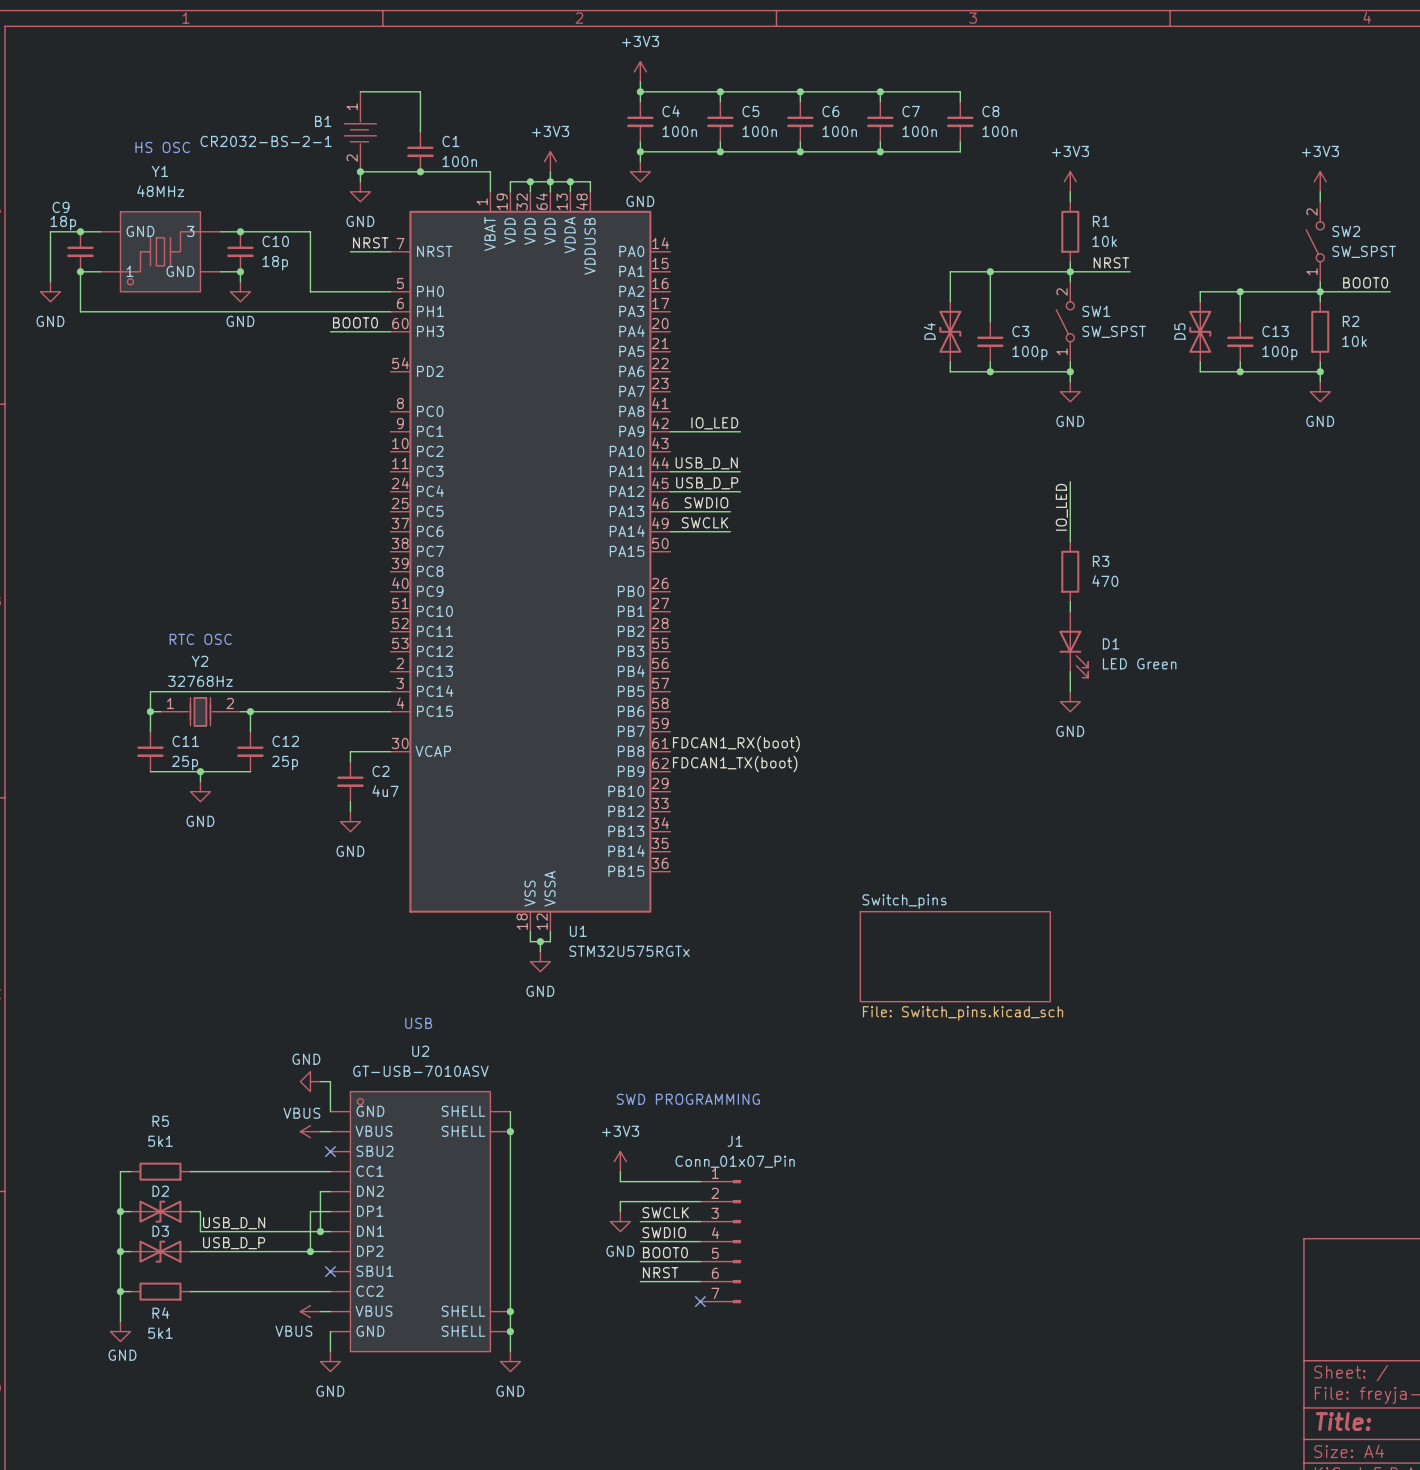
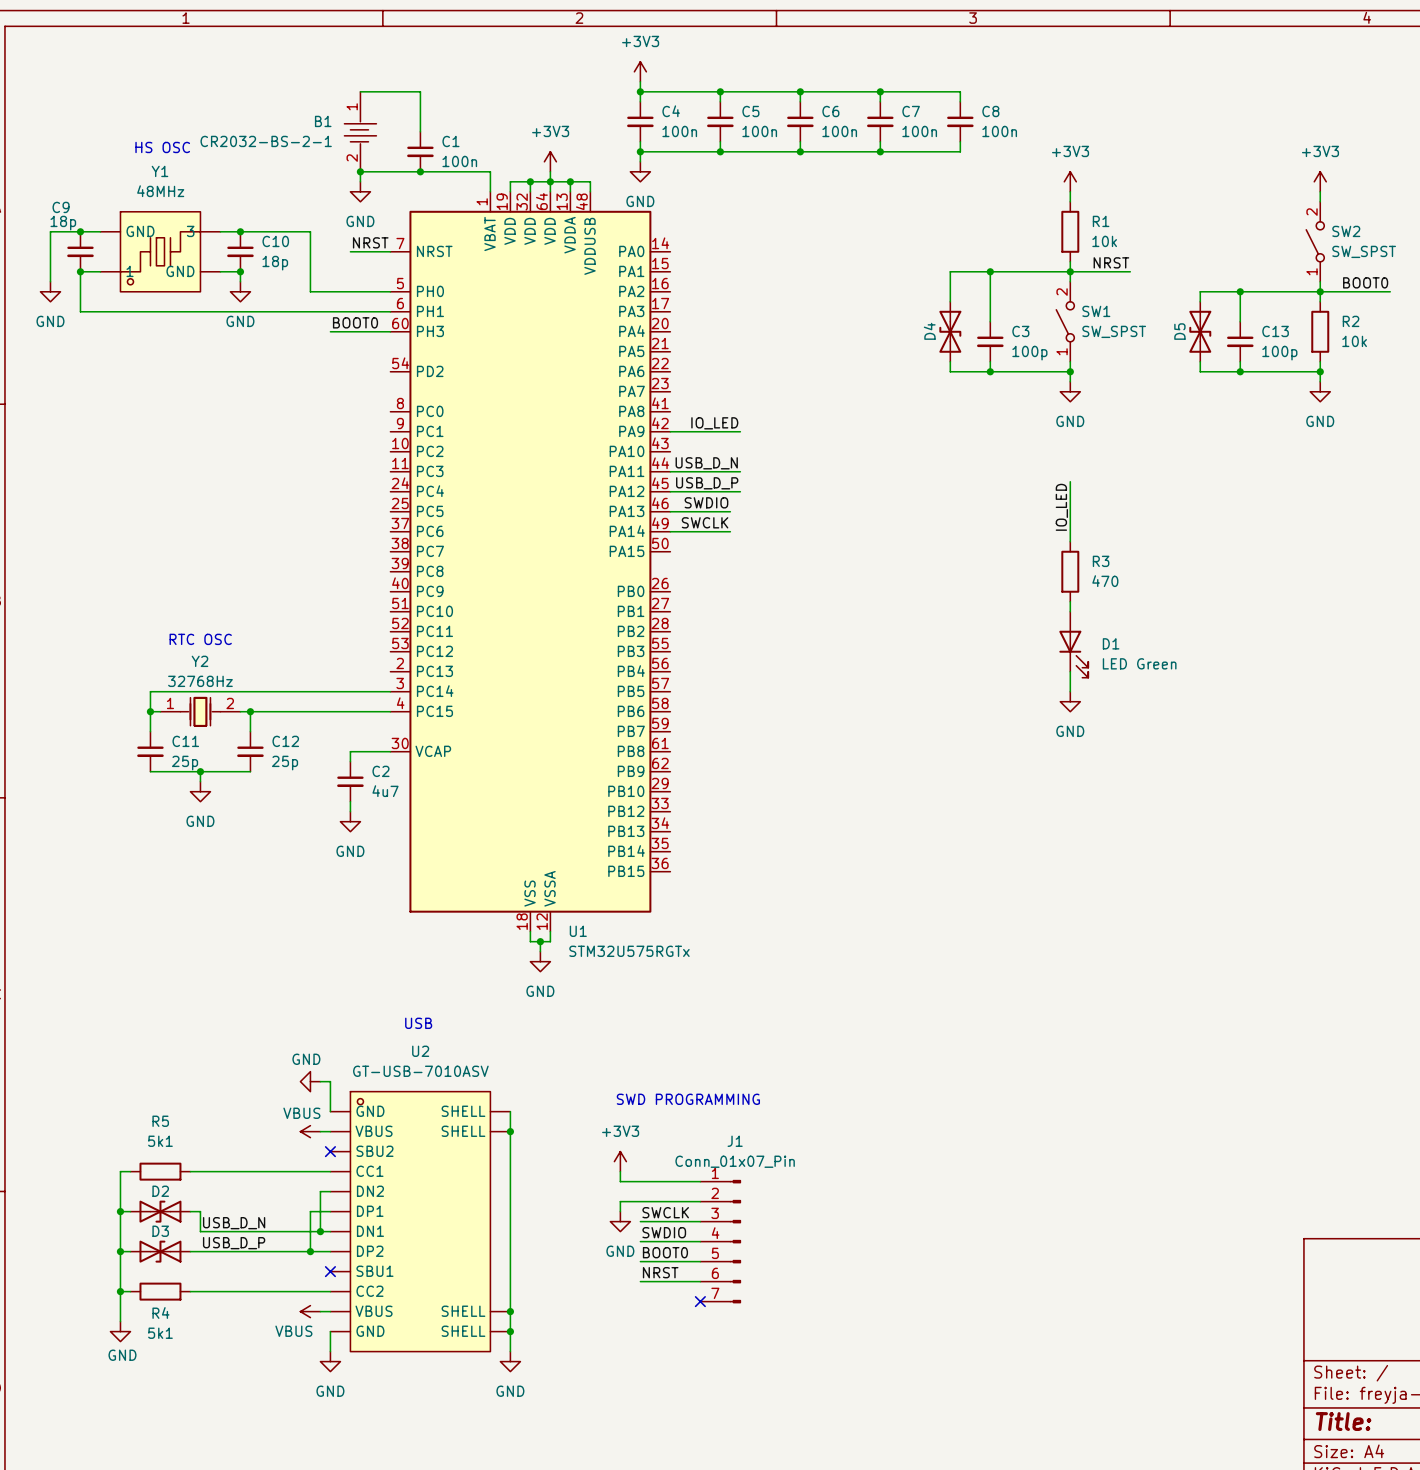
label: FDCAN1_RX(boot) (736, 743) -> none
label: FDCAN1_TX(boot) (735, 763) -> none
sheet Switch_pins: File: Switch_pins.kicad_sch (955, 956) -> none

